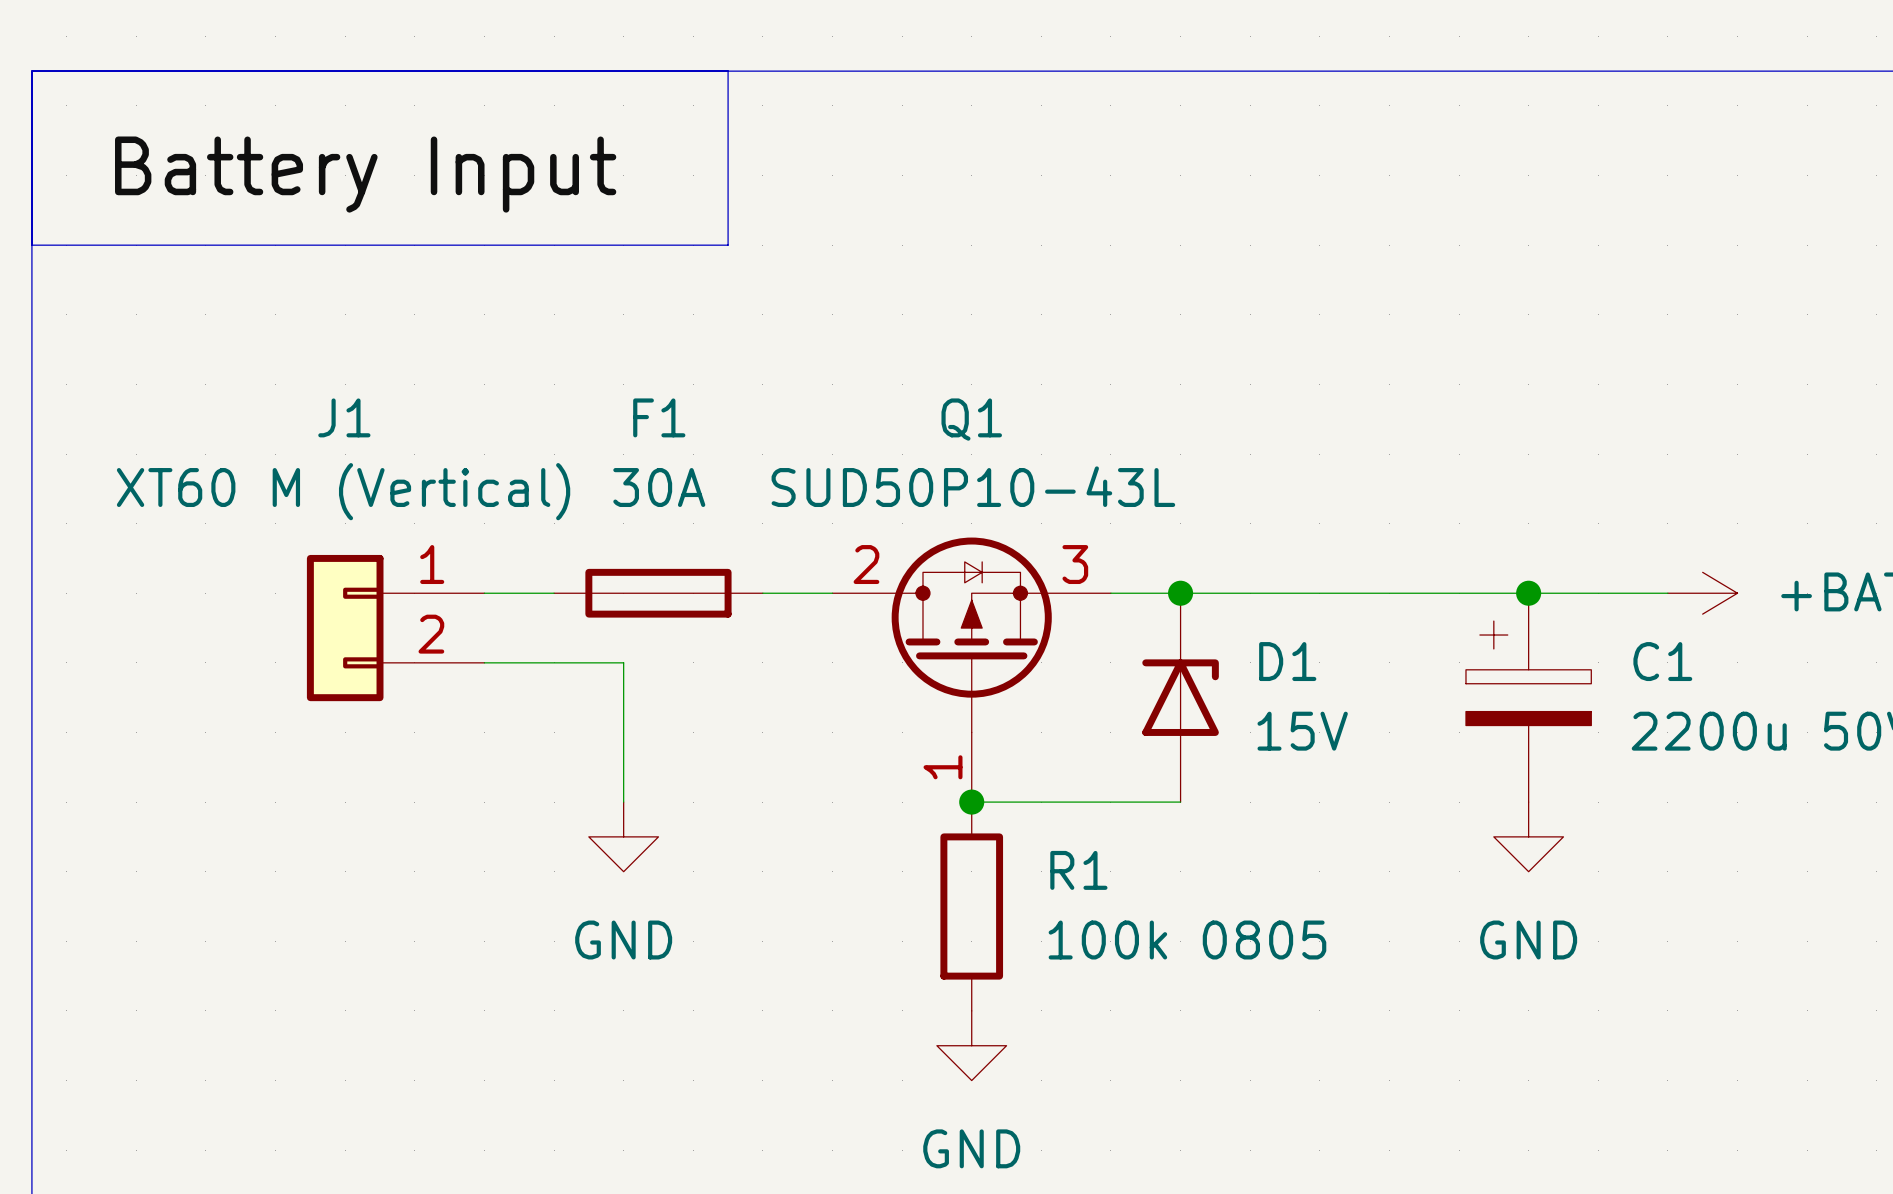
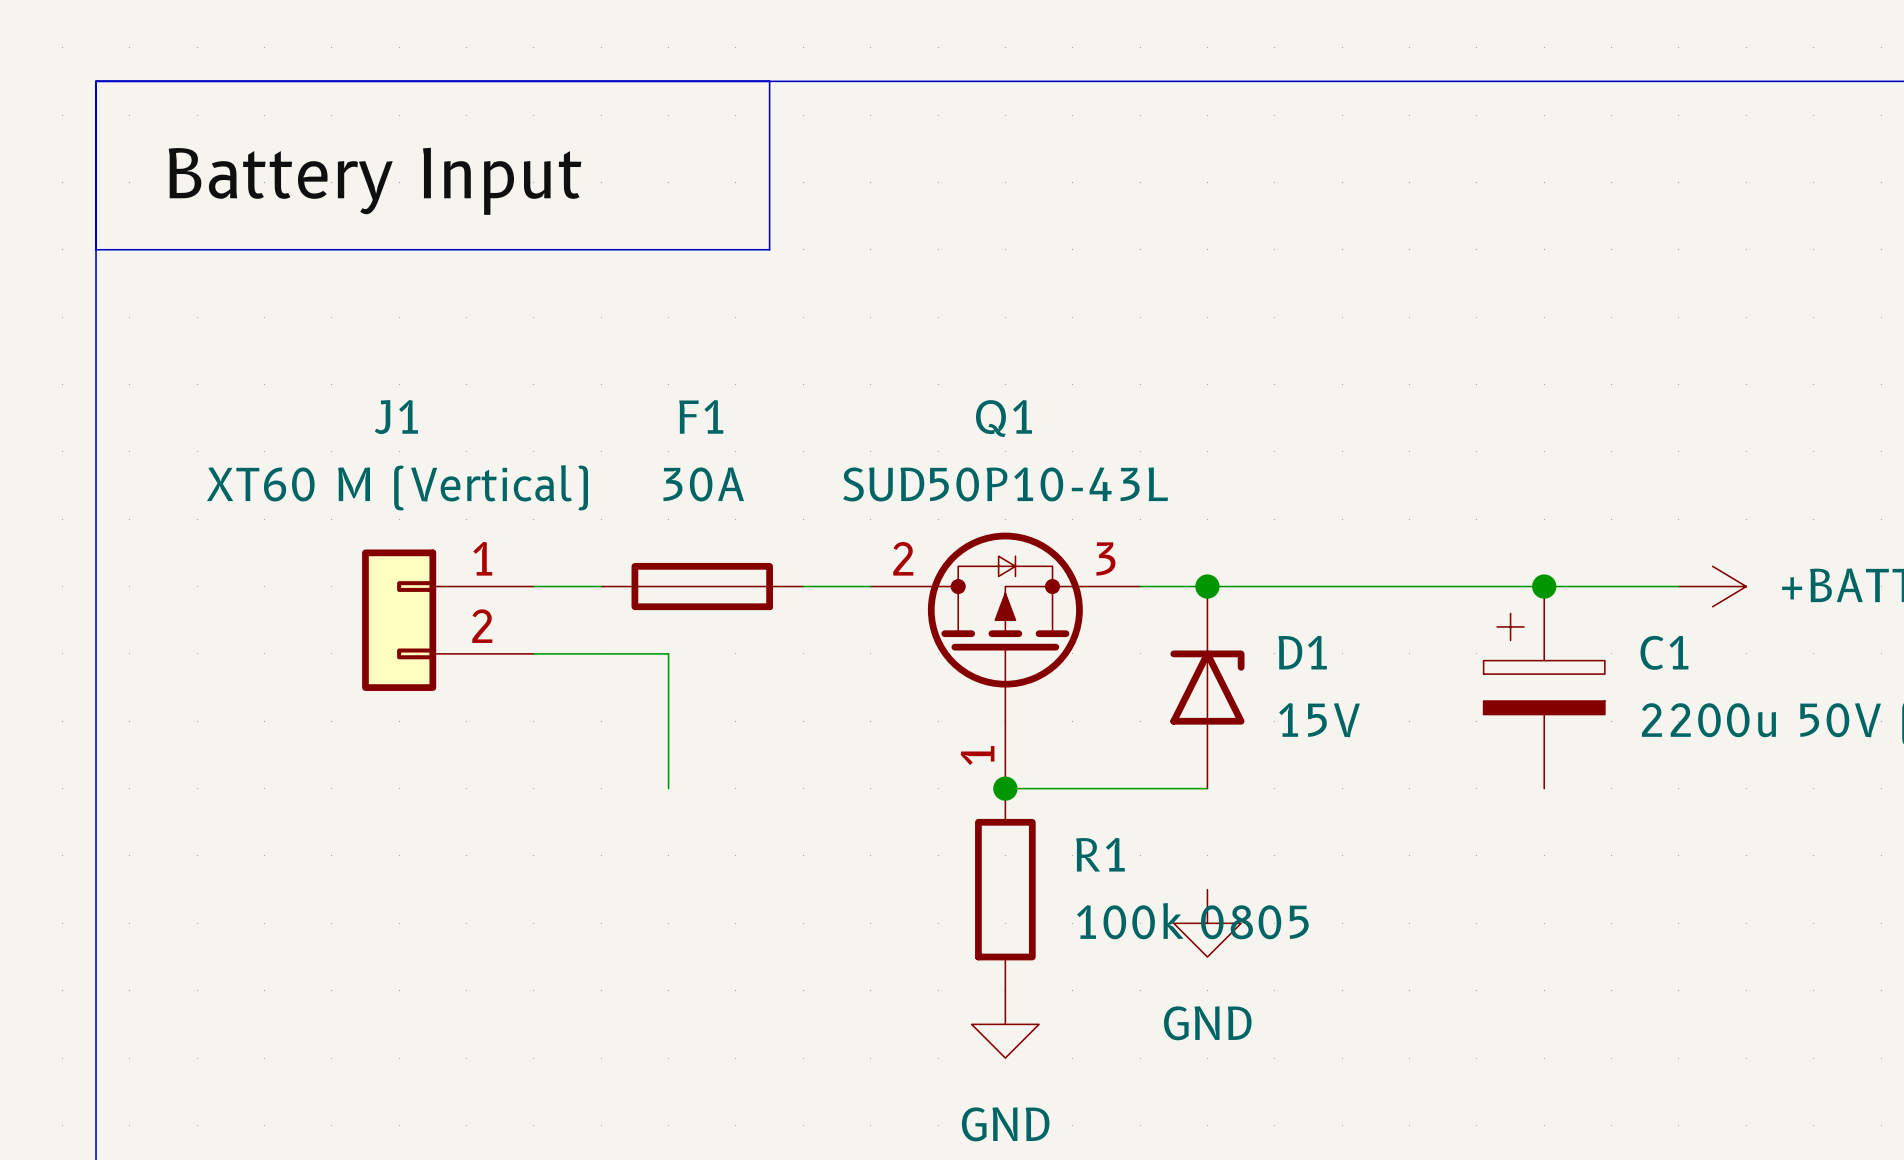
power symbol: GND (623, 836) -> none
power symbol: GND (1528, 836) -> none
power symbol: none -> GND (1207, 923)

